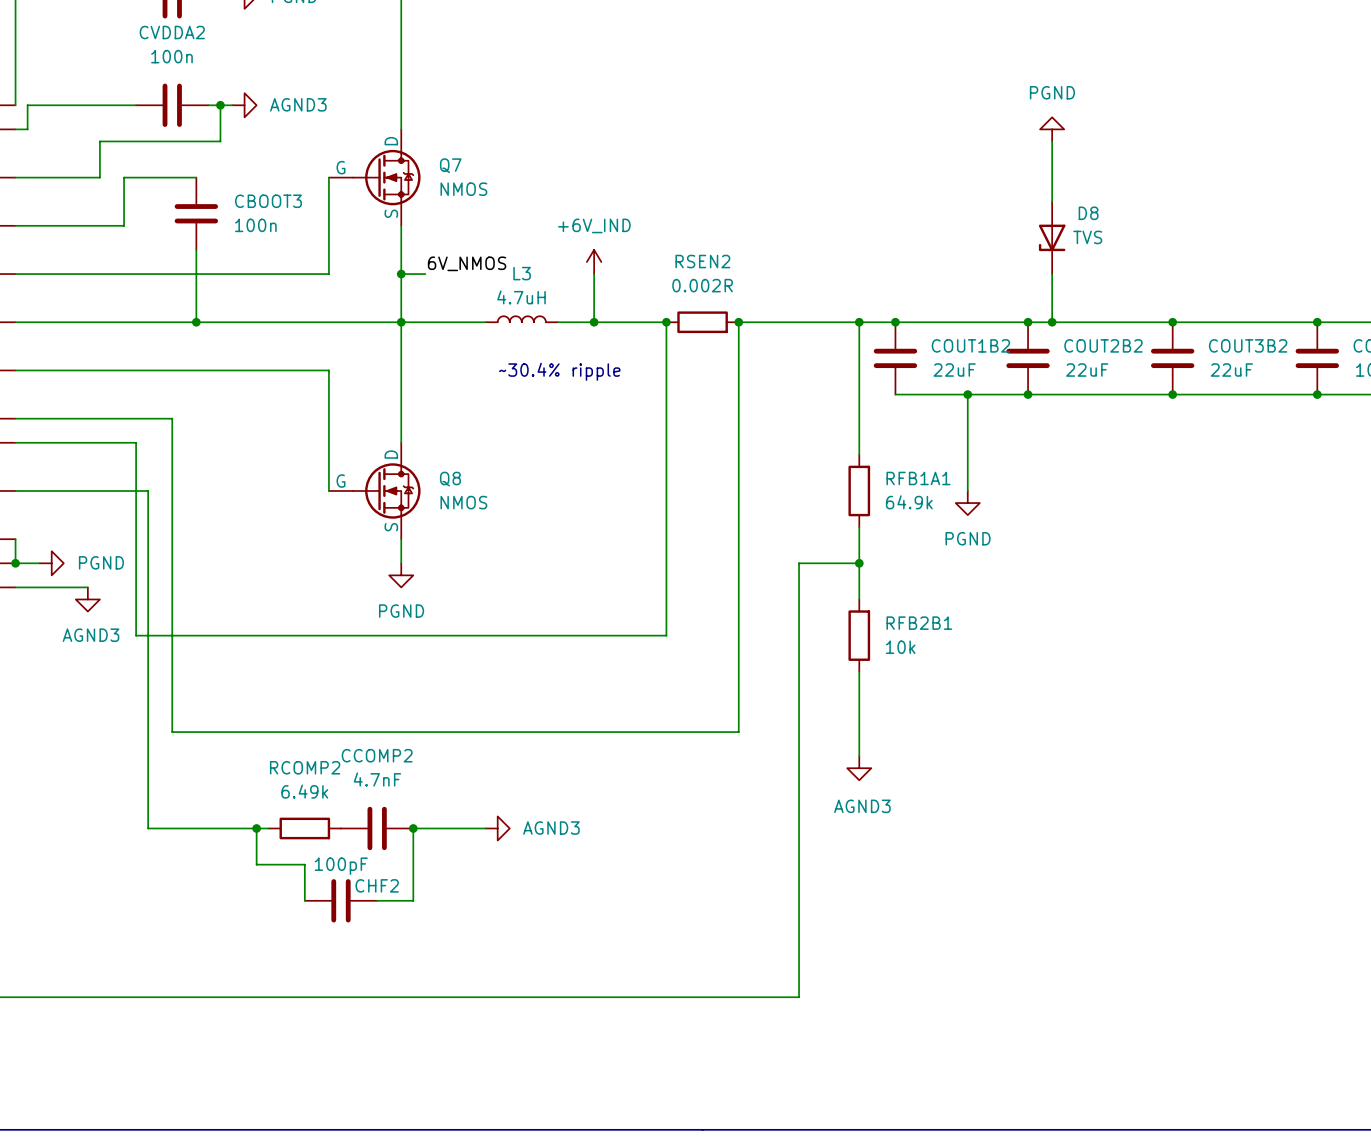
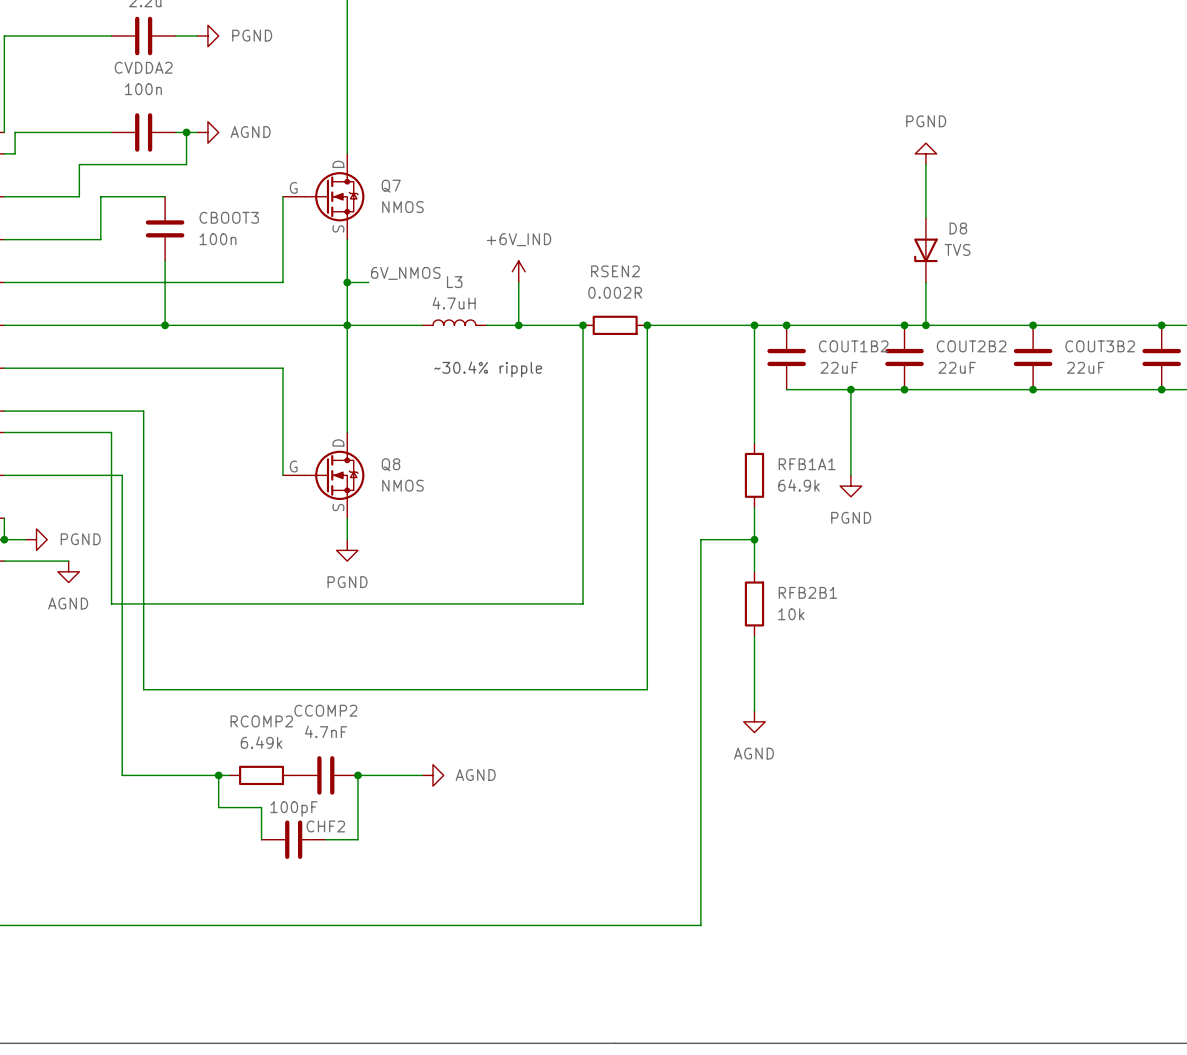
power symbol: AGND3 (244, 105) -> AGND (207, 132)
power symbol: AGND3 (87, 599) -> AGND (68, 571)
power symbol: AGND3 (859, 768) -> AGND (754, 721)
power symbol: AGND3 (497, 828) -> AGND (432, 775)

